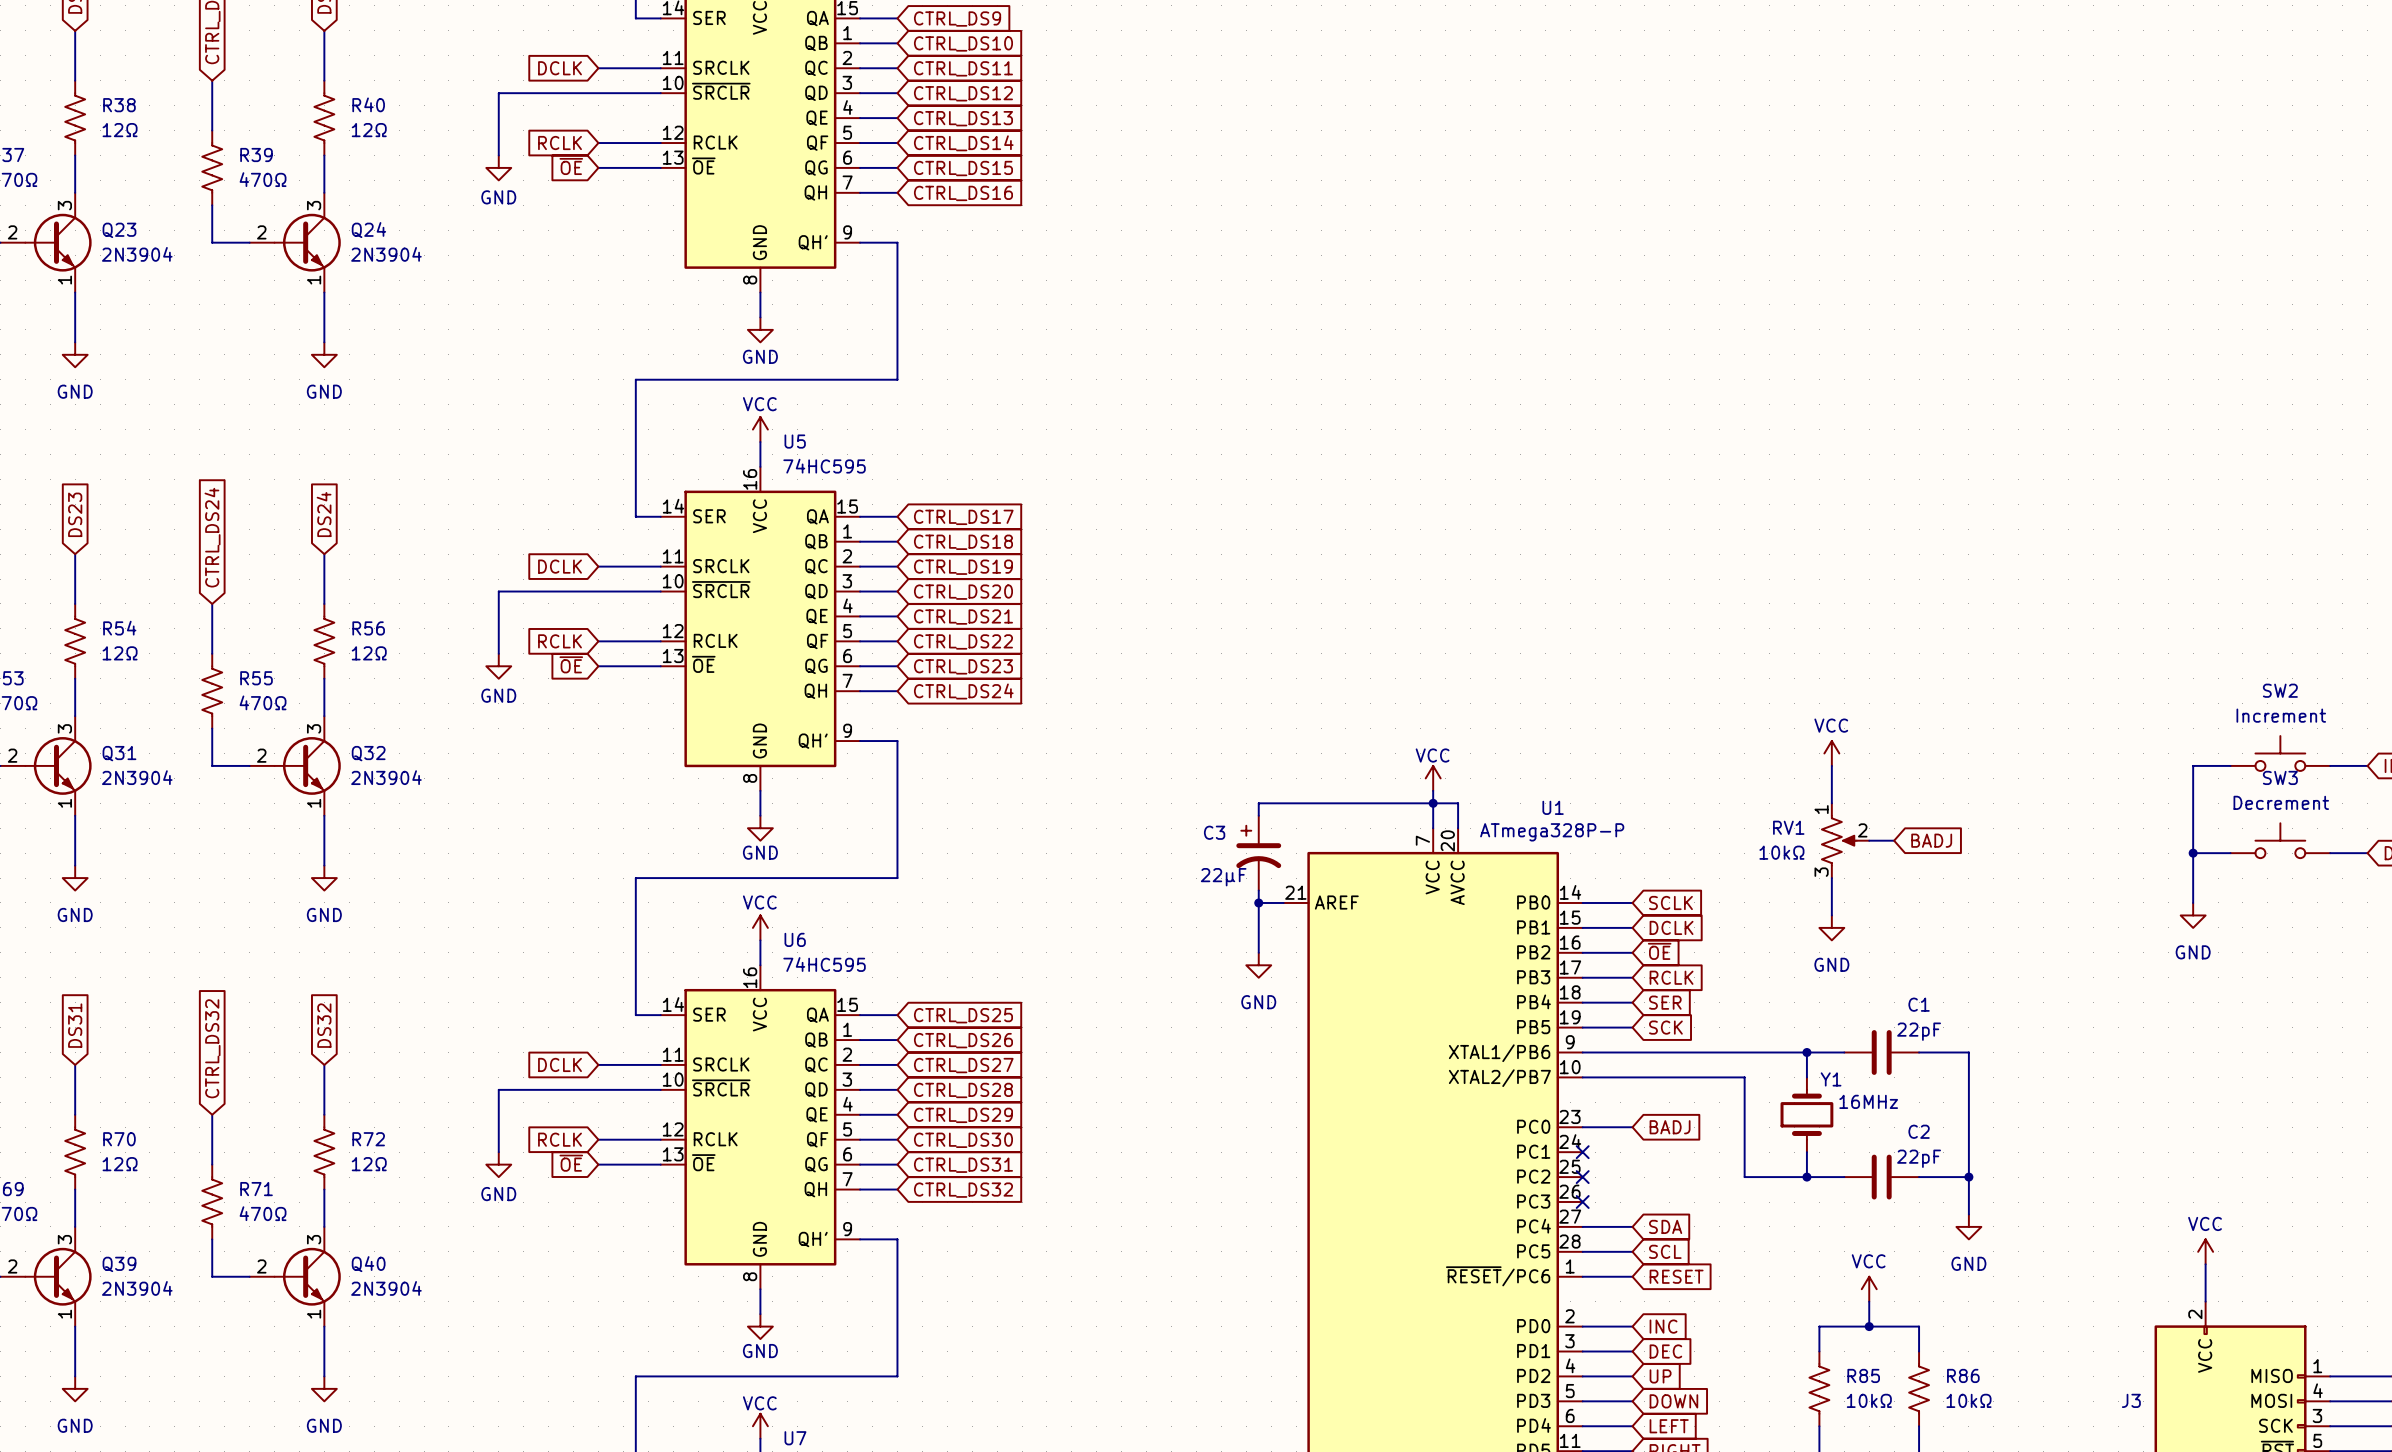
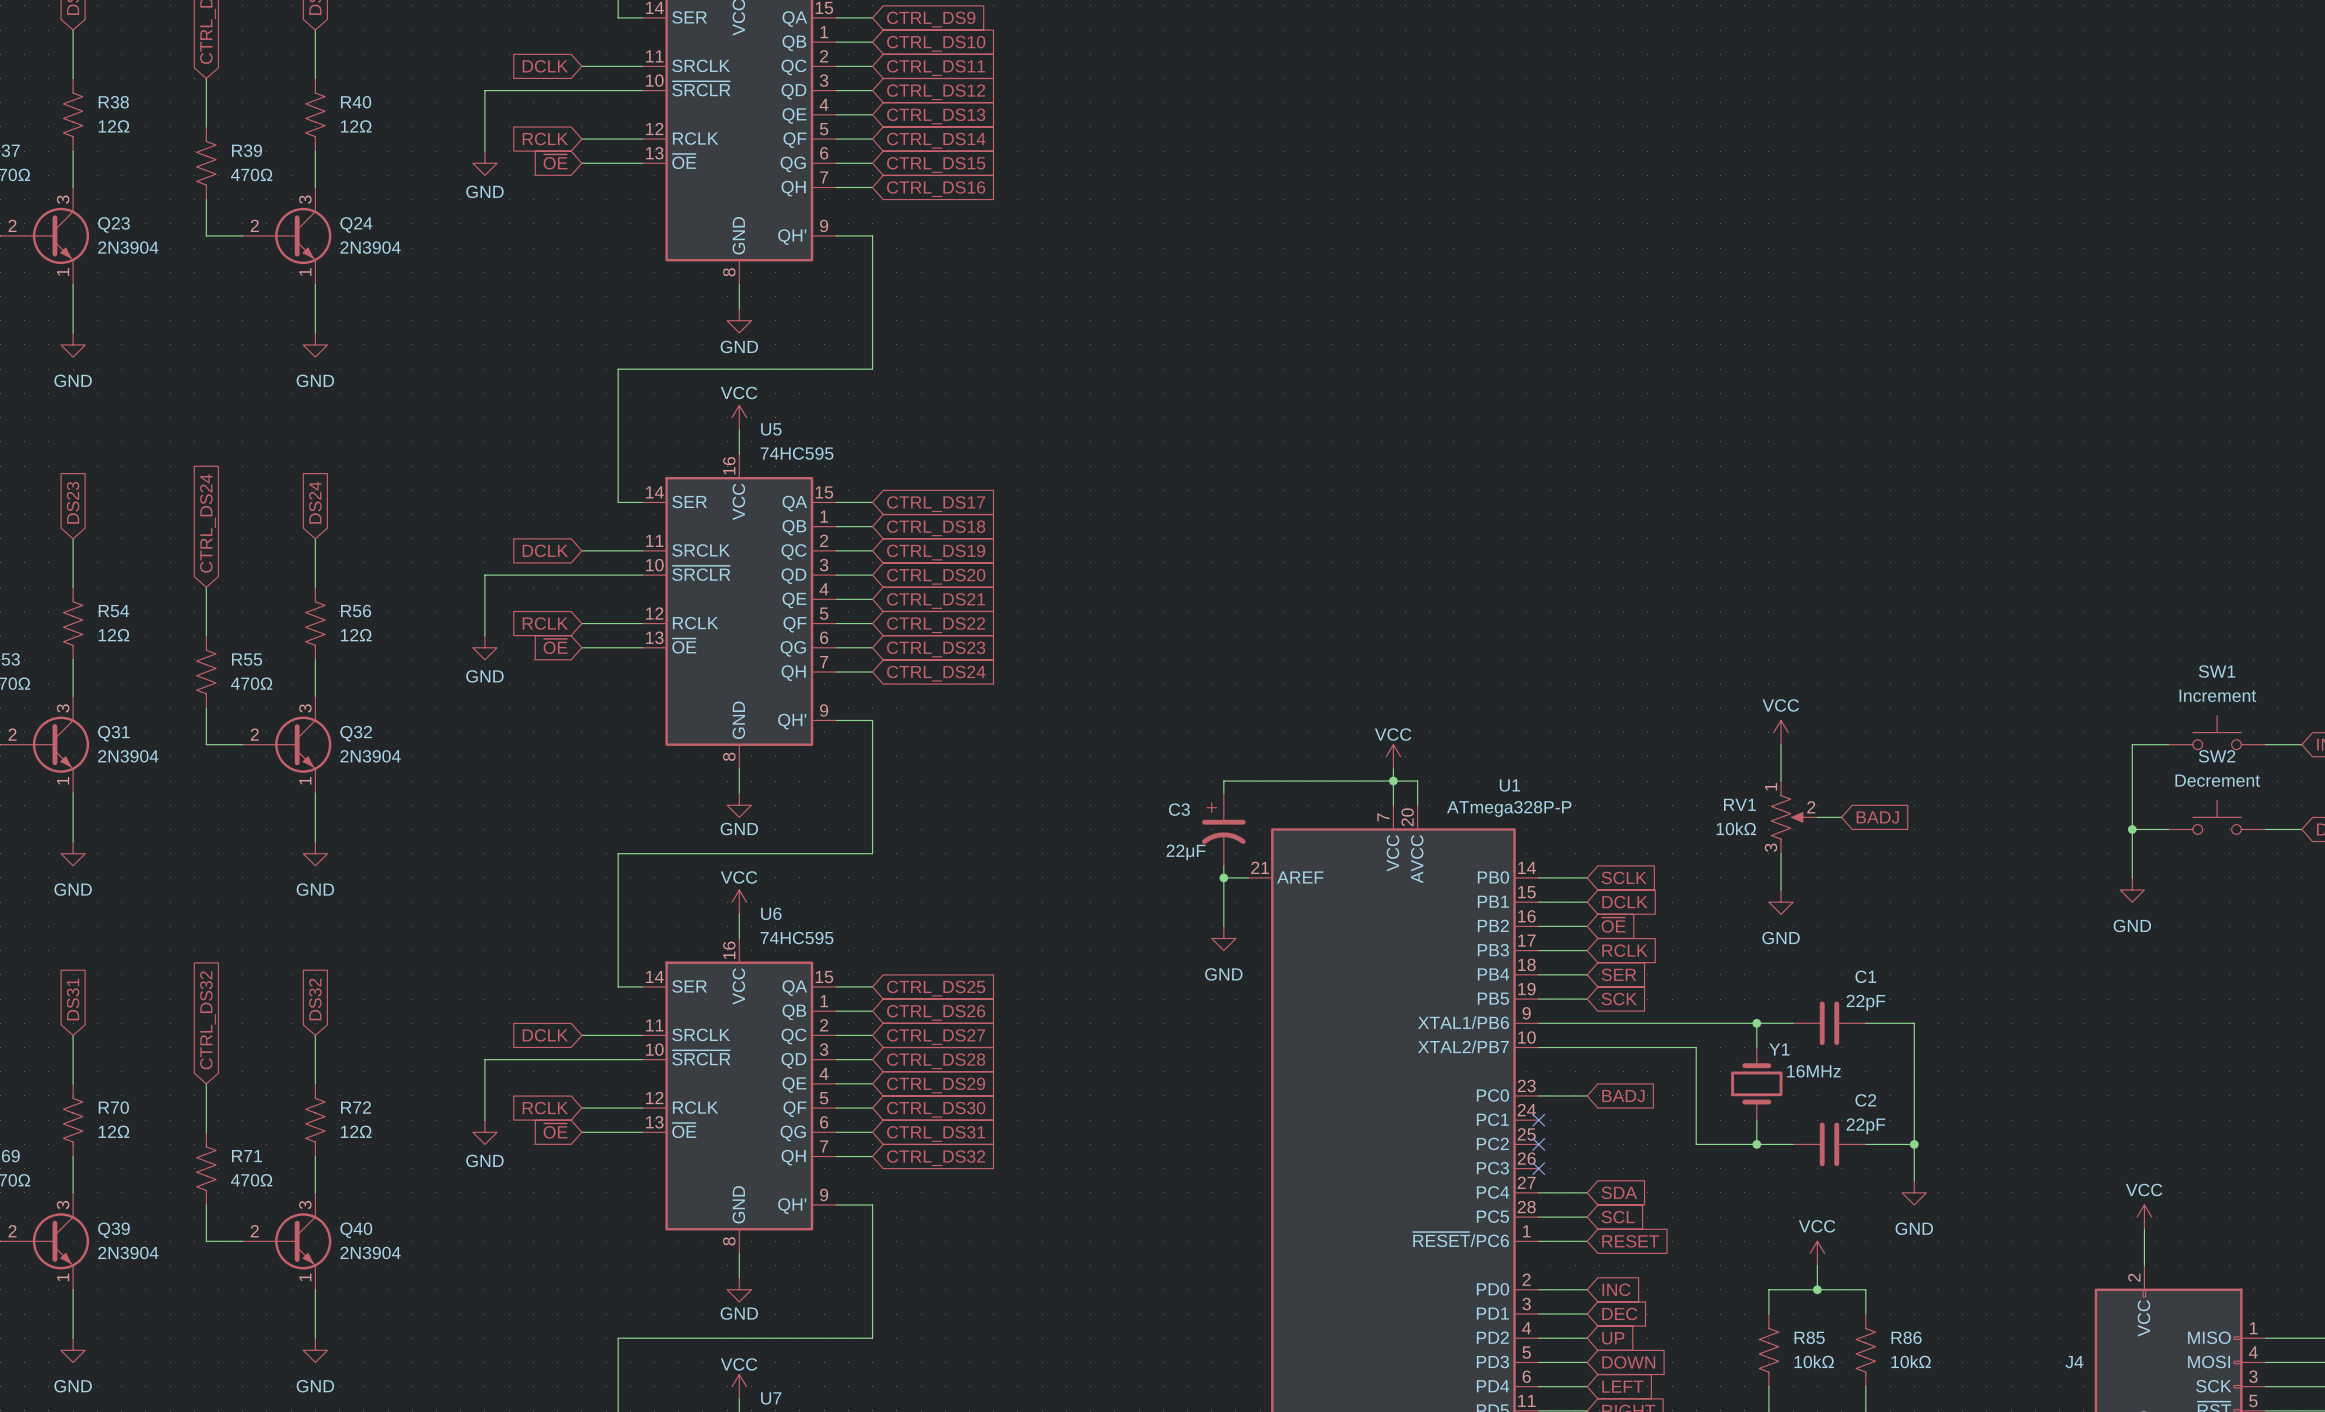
SW2 name: SW2 (2280, 690) -> SW1 (2217, 671)
SW3 name: SW3 (2280, 777) -> SW2 (2217, 756)
J3 name: J3 (2131, 1400) -> J4 (2074, 1362)

